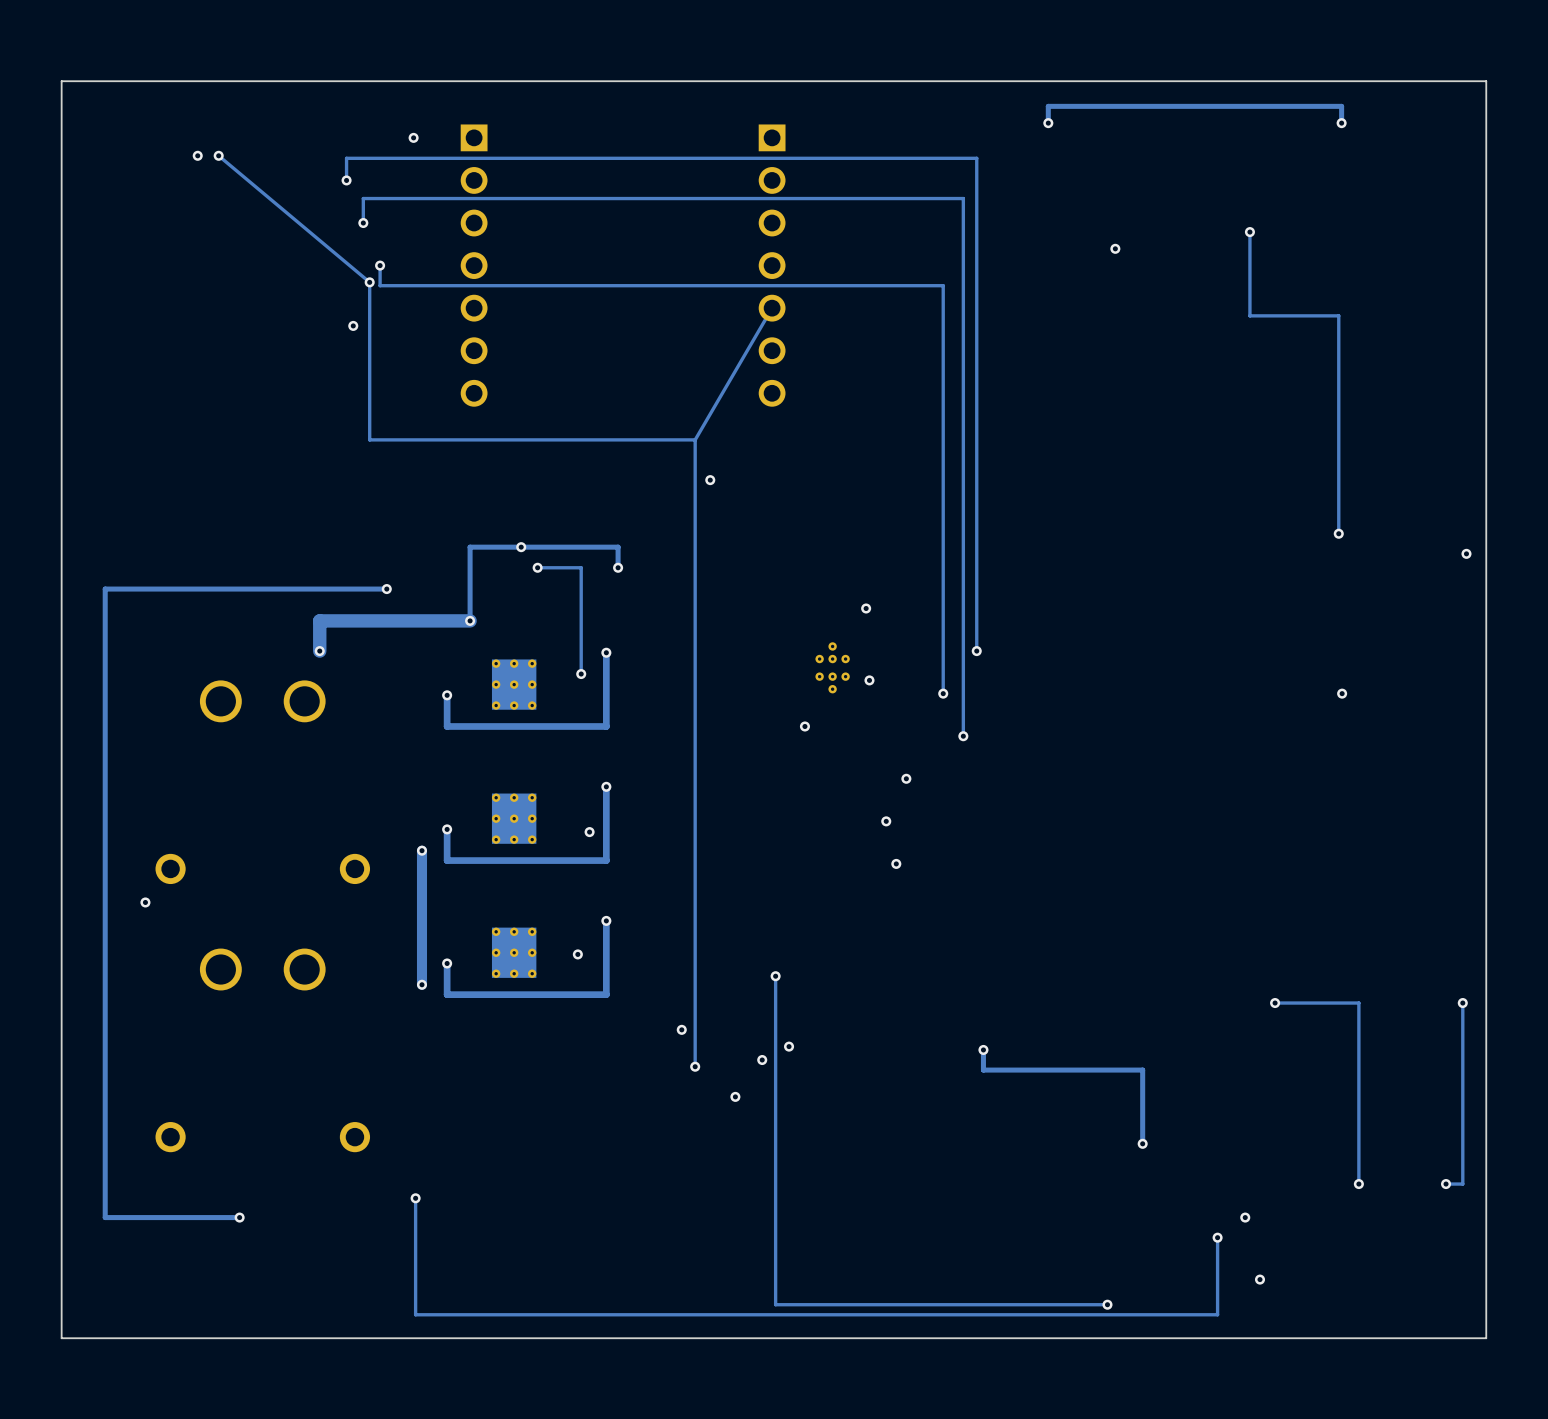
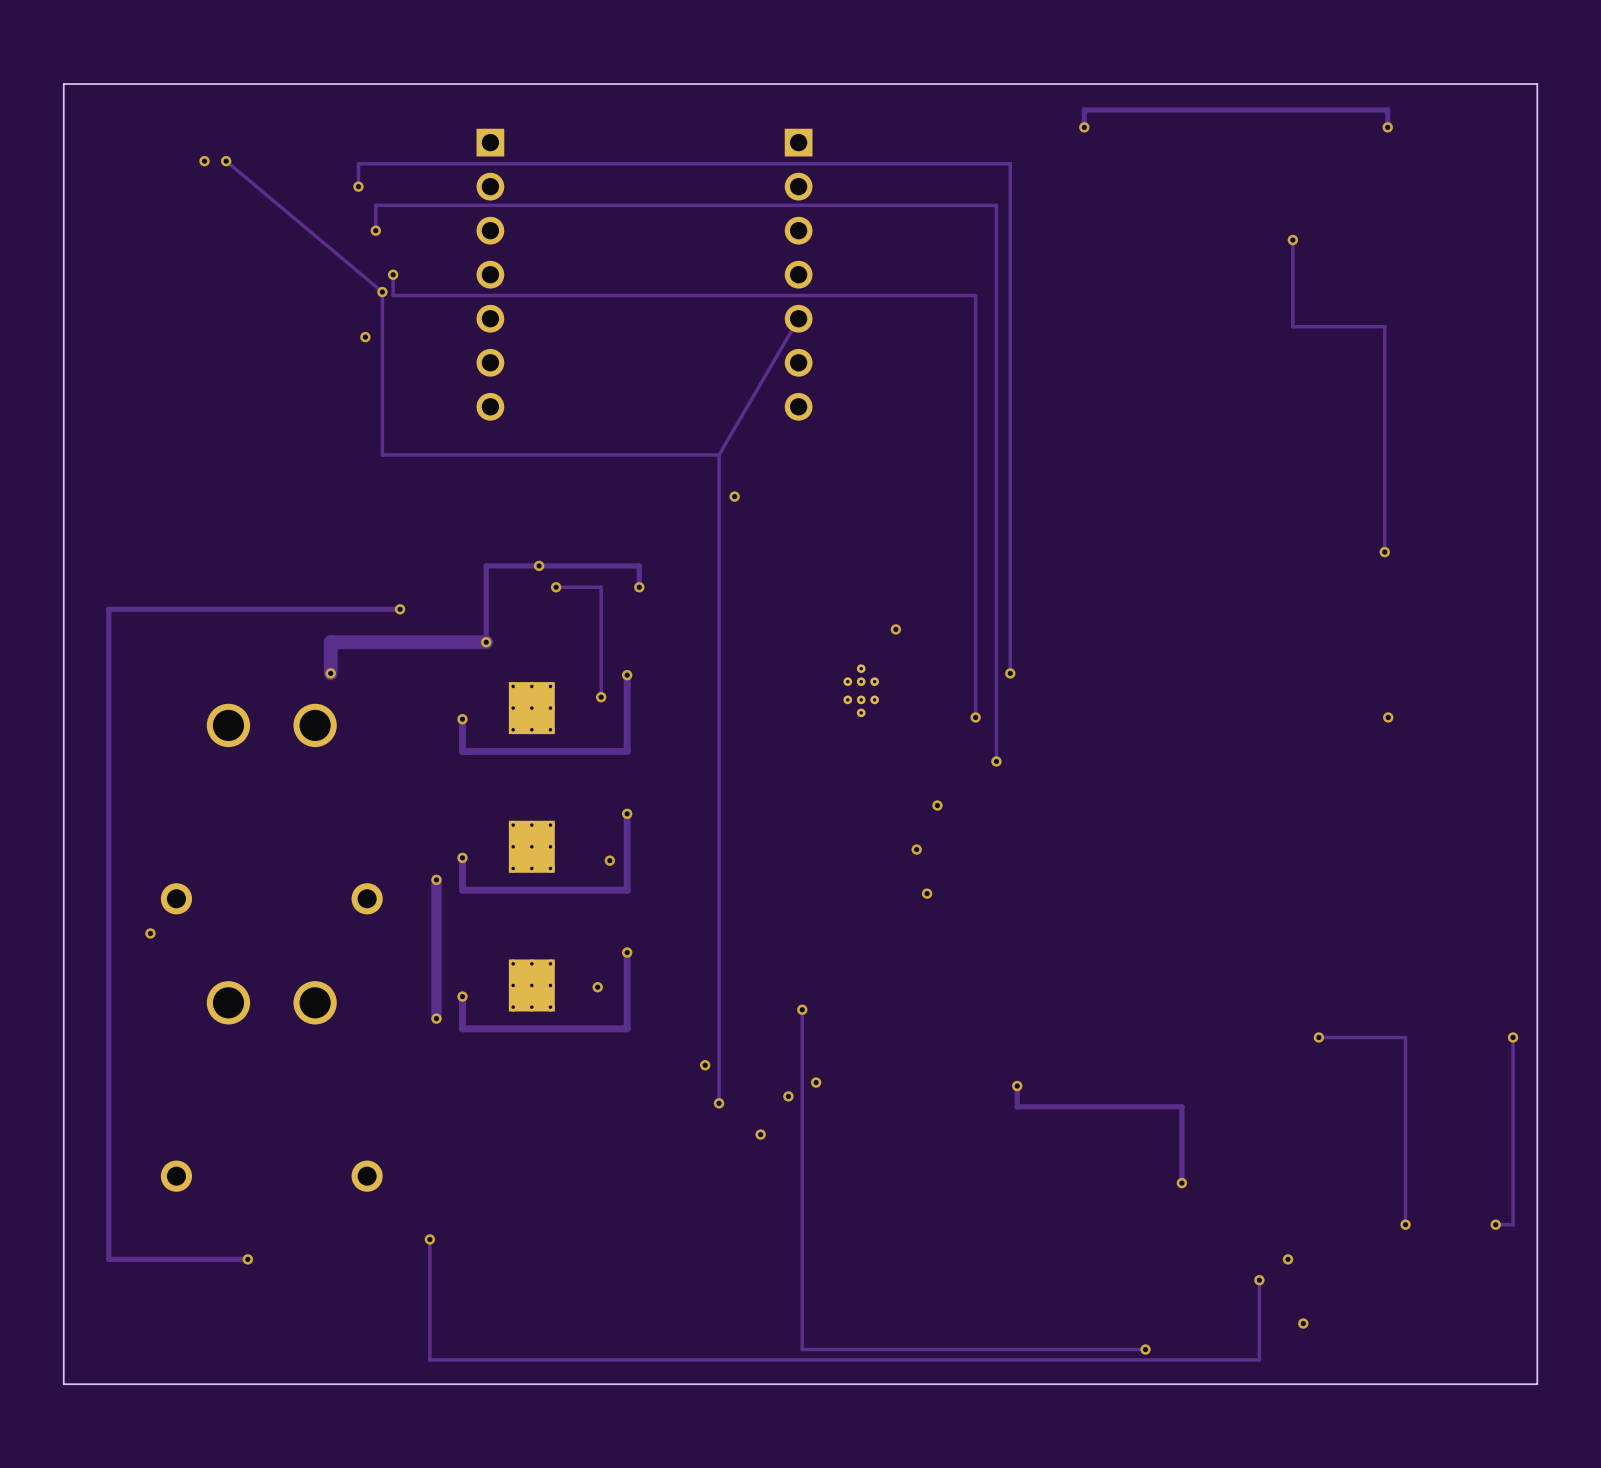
via: (413, 137) -> none
via: (1115, 248) -> none
via: (1466, 553) -> none
via: (869, 680) -> none
via: (804, 726) -> none

